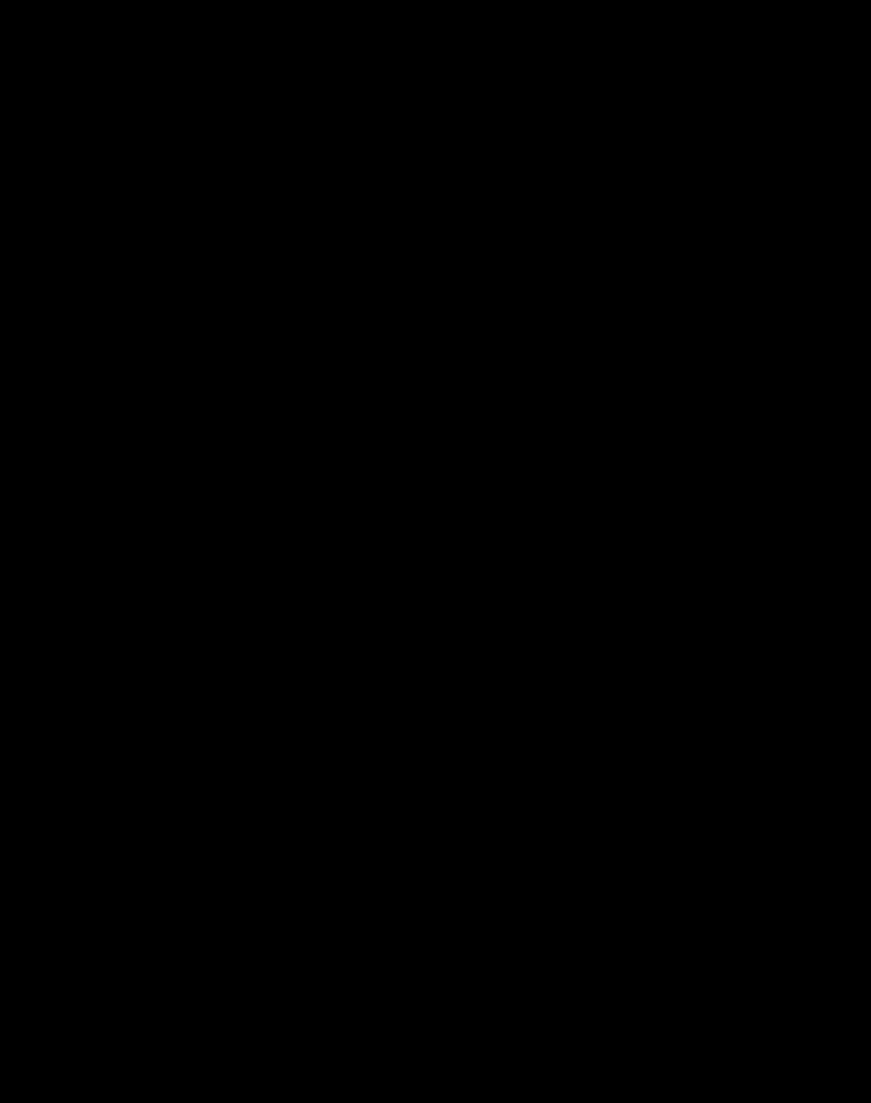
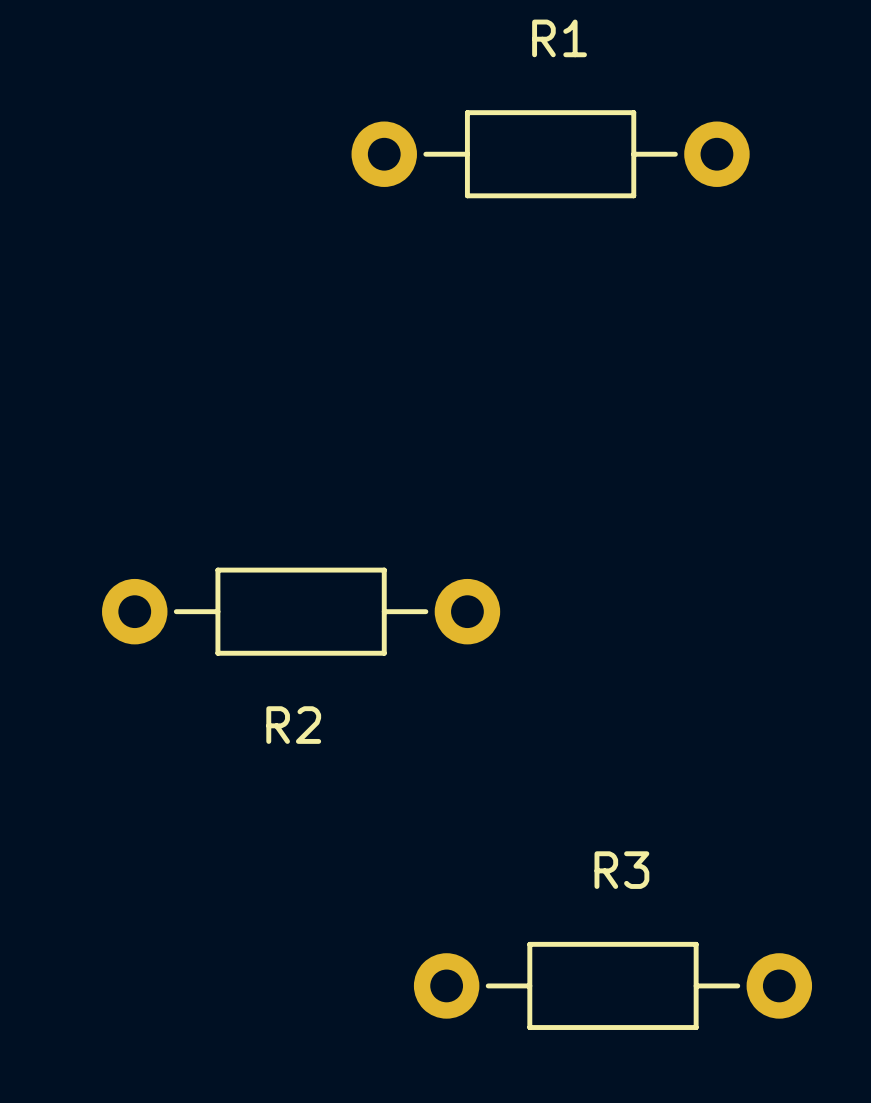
R1: none -> (550, 154)
R2: none -> (301, 611)
R3: none -> (612, 985)

